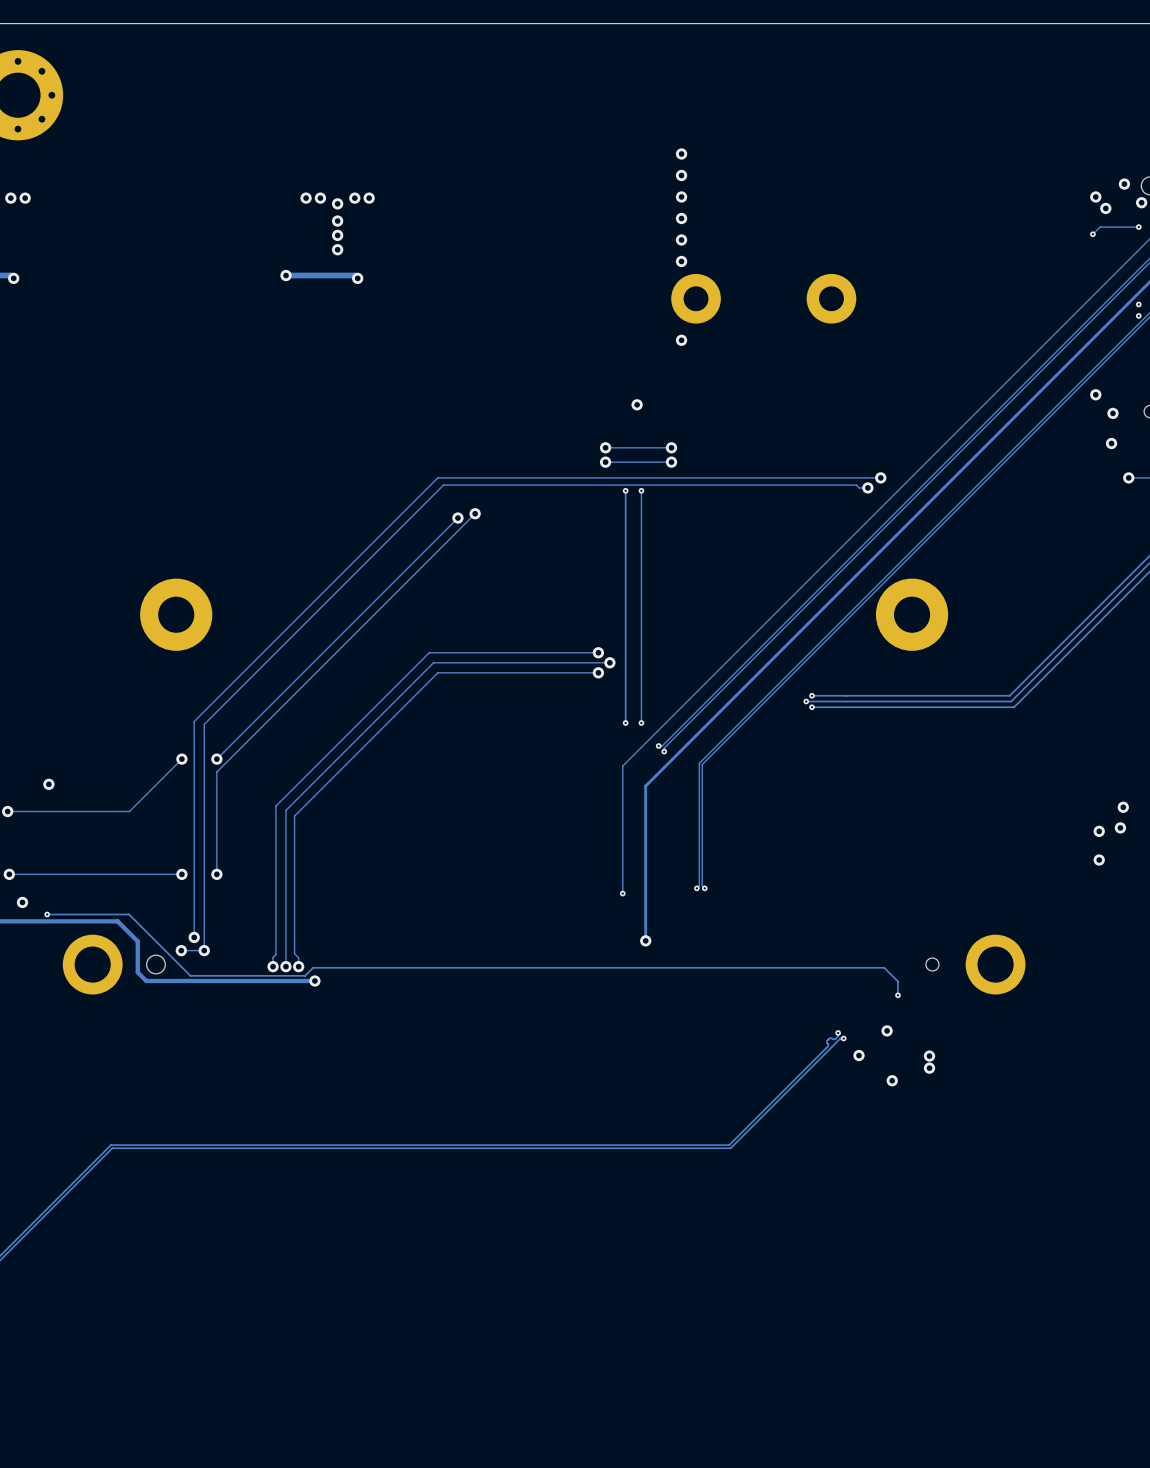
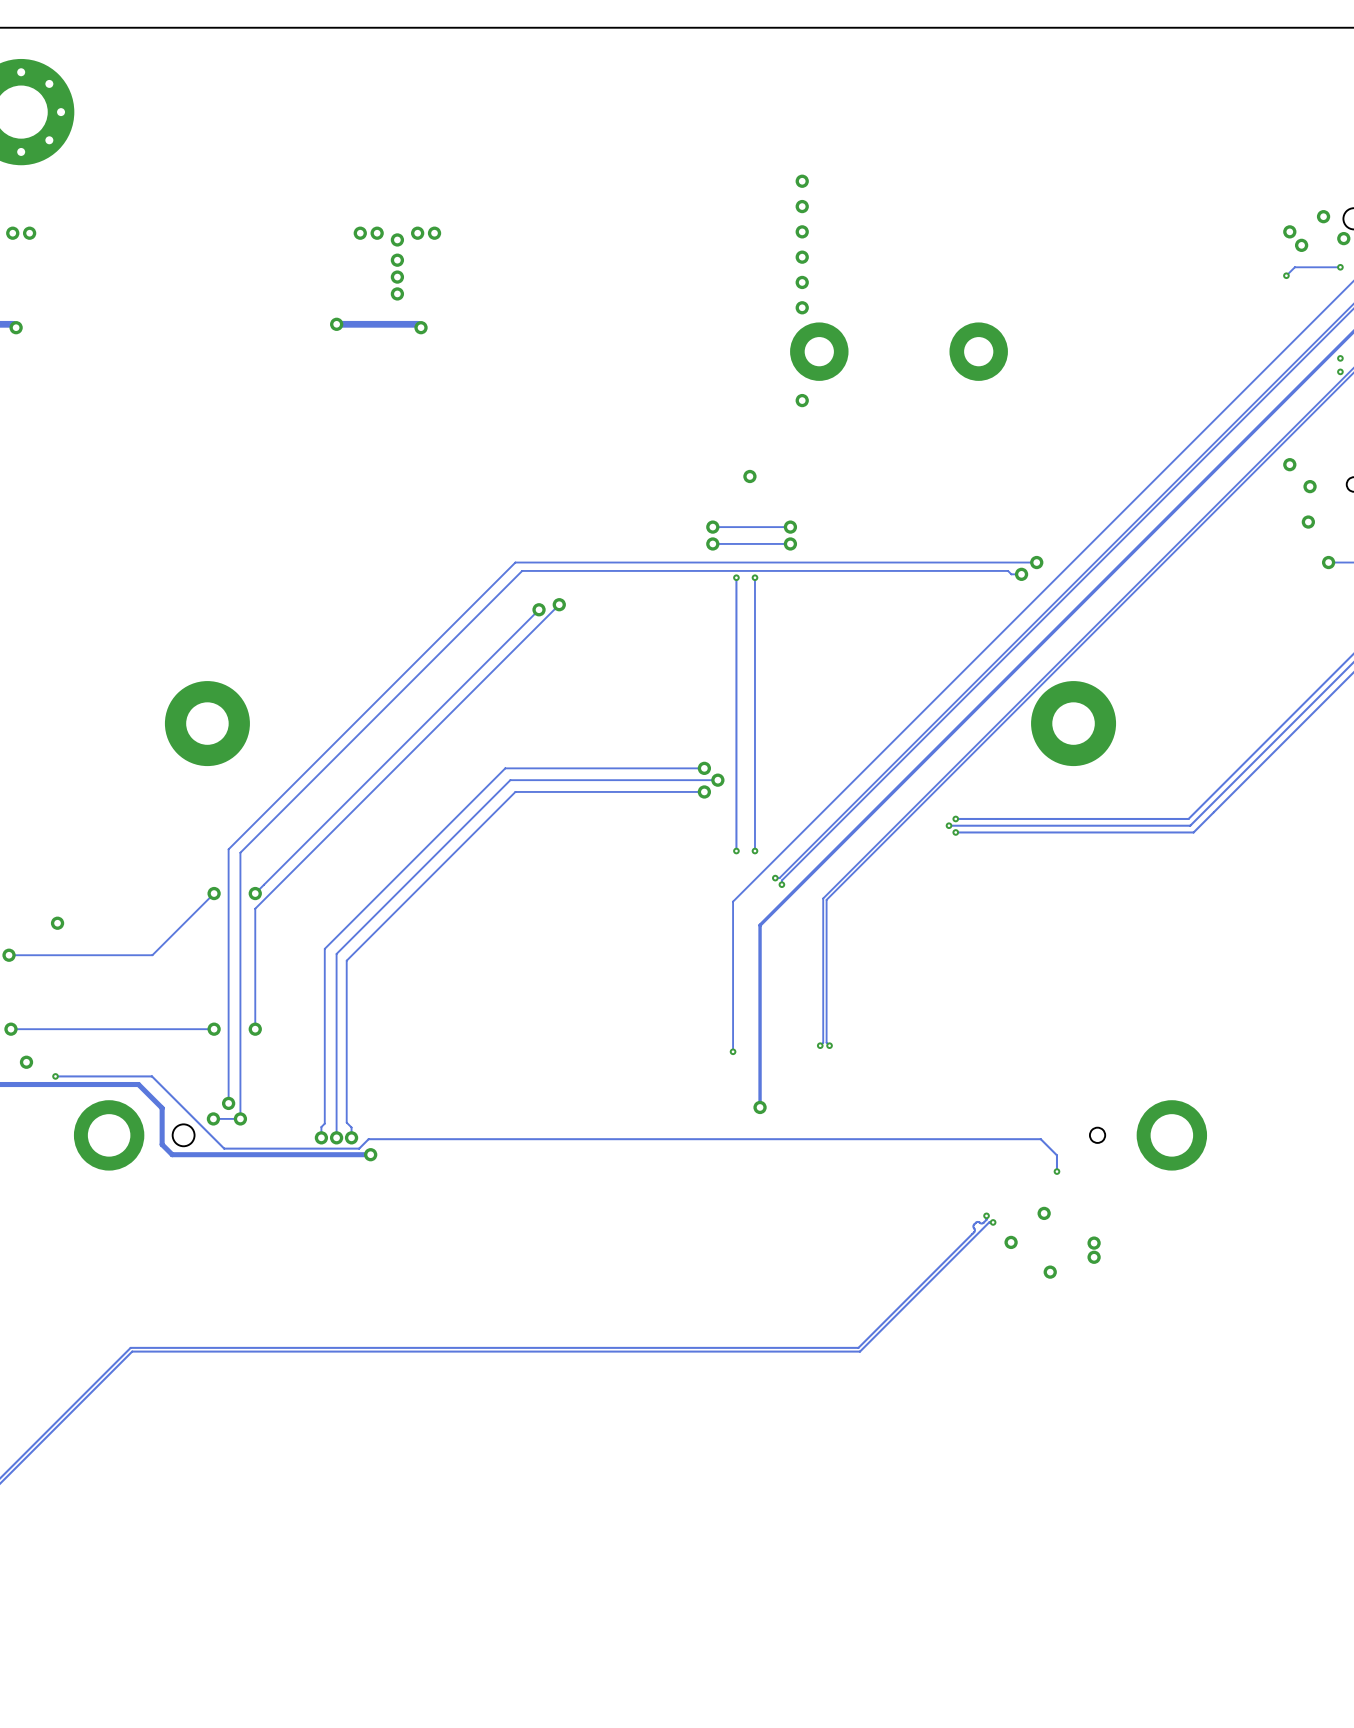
via: (1123, 807) -> none
via: (1120, 827) -> none
via: (1099, 831) -> none
via: (1099, 860) -> none

